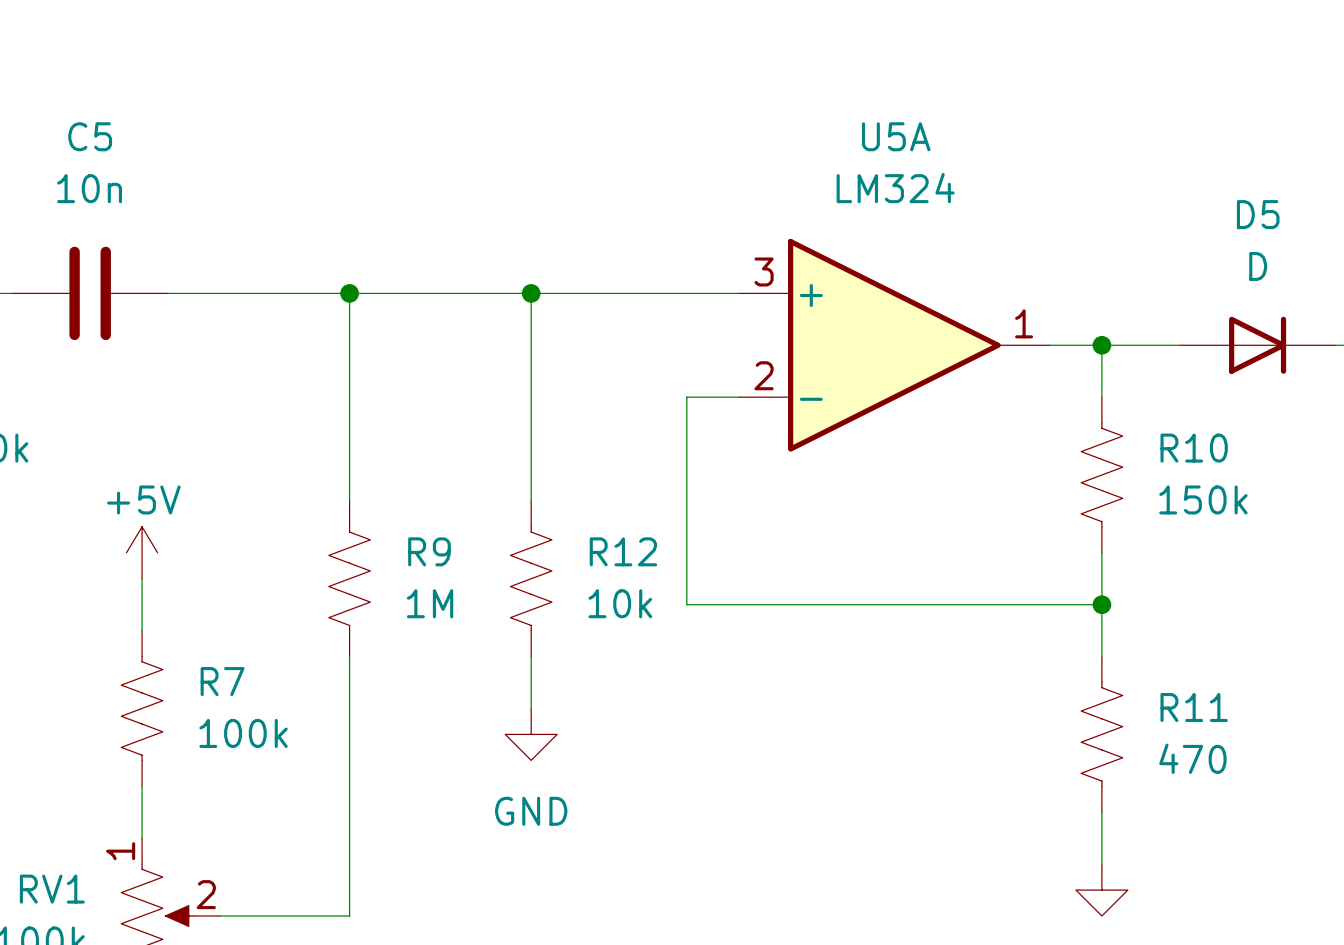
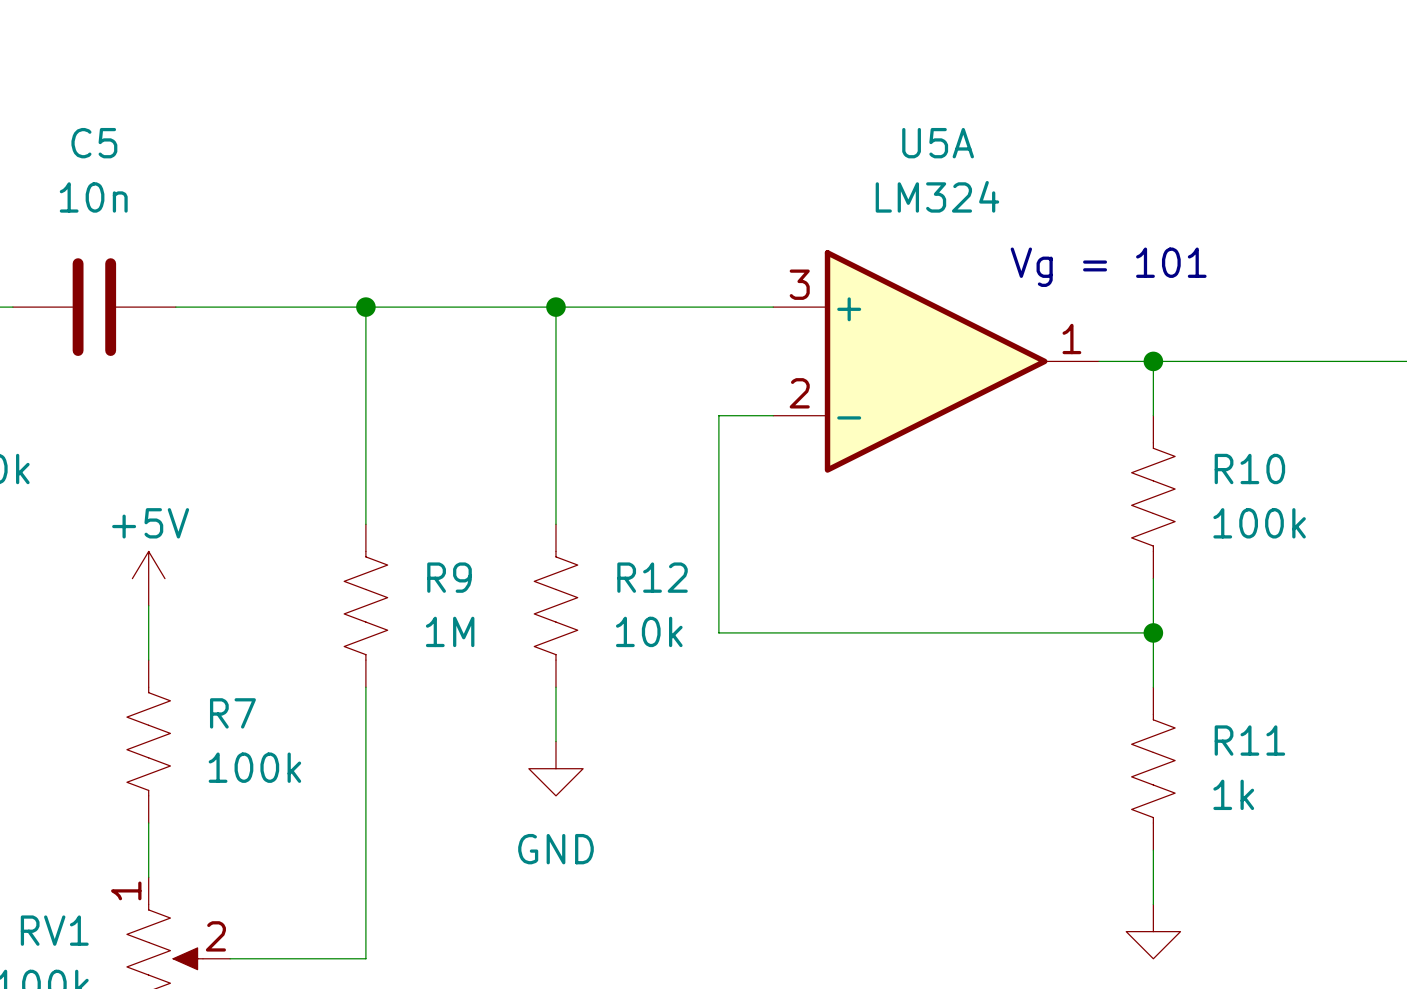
text: none -> Vg = 101 (1108, 267)
D5: D (1257, 345) -> none
R10 value: 150k (1203, 499) -> 100k (1259, 523)
R11 value: 470 (1192, 758) -> 1k (1233, 794)

